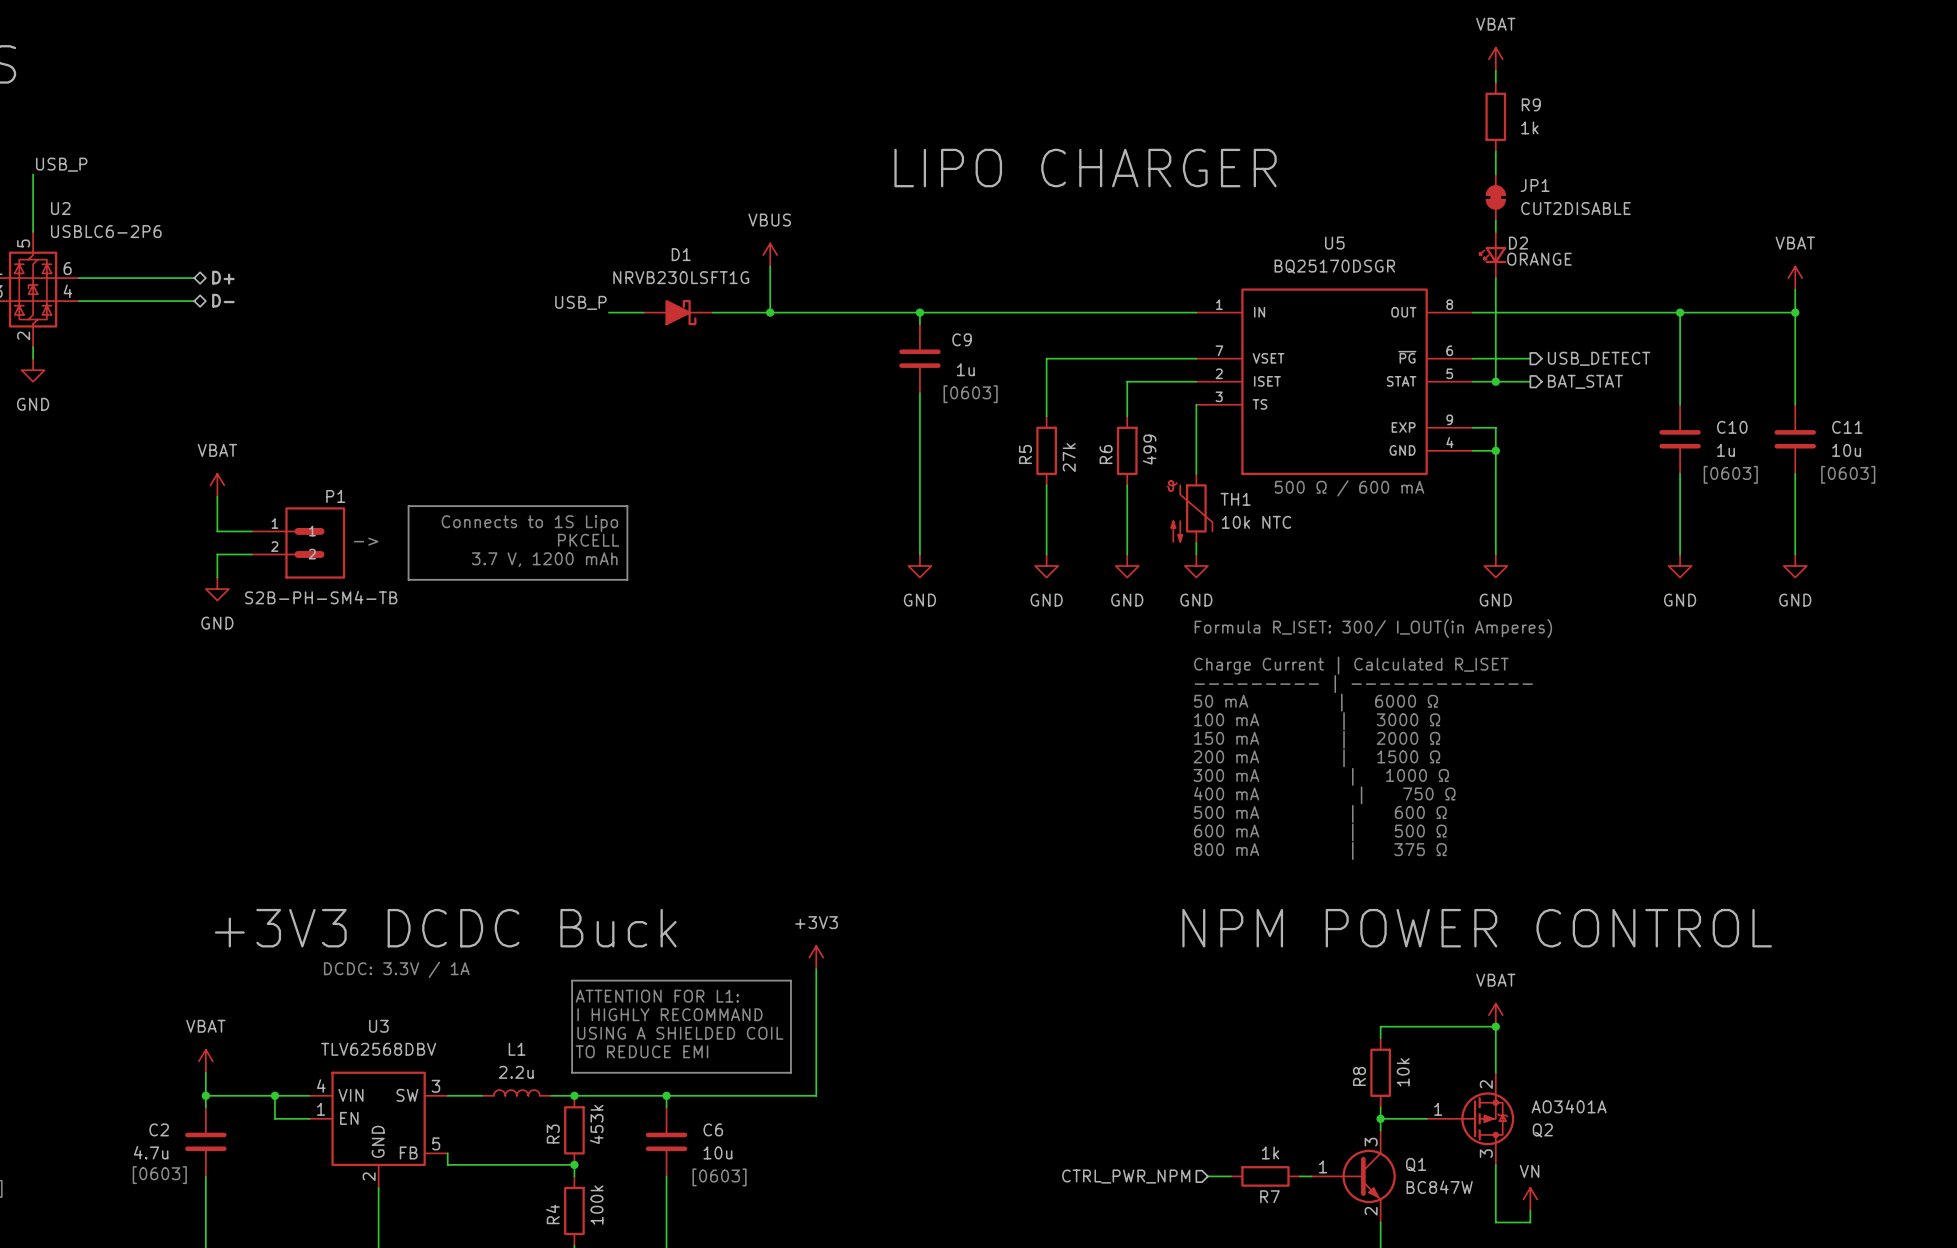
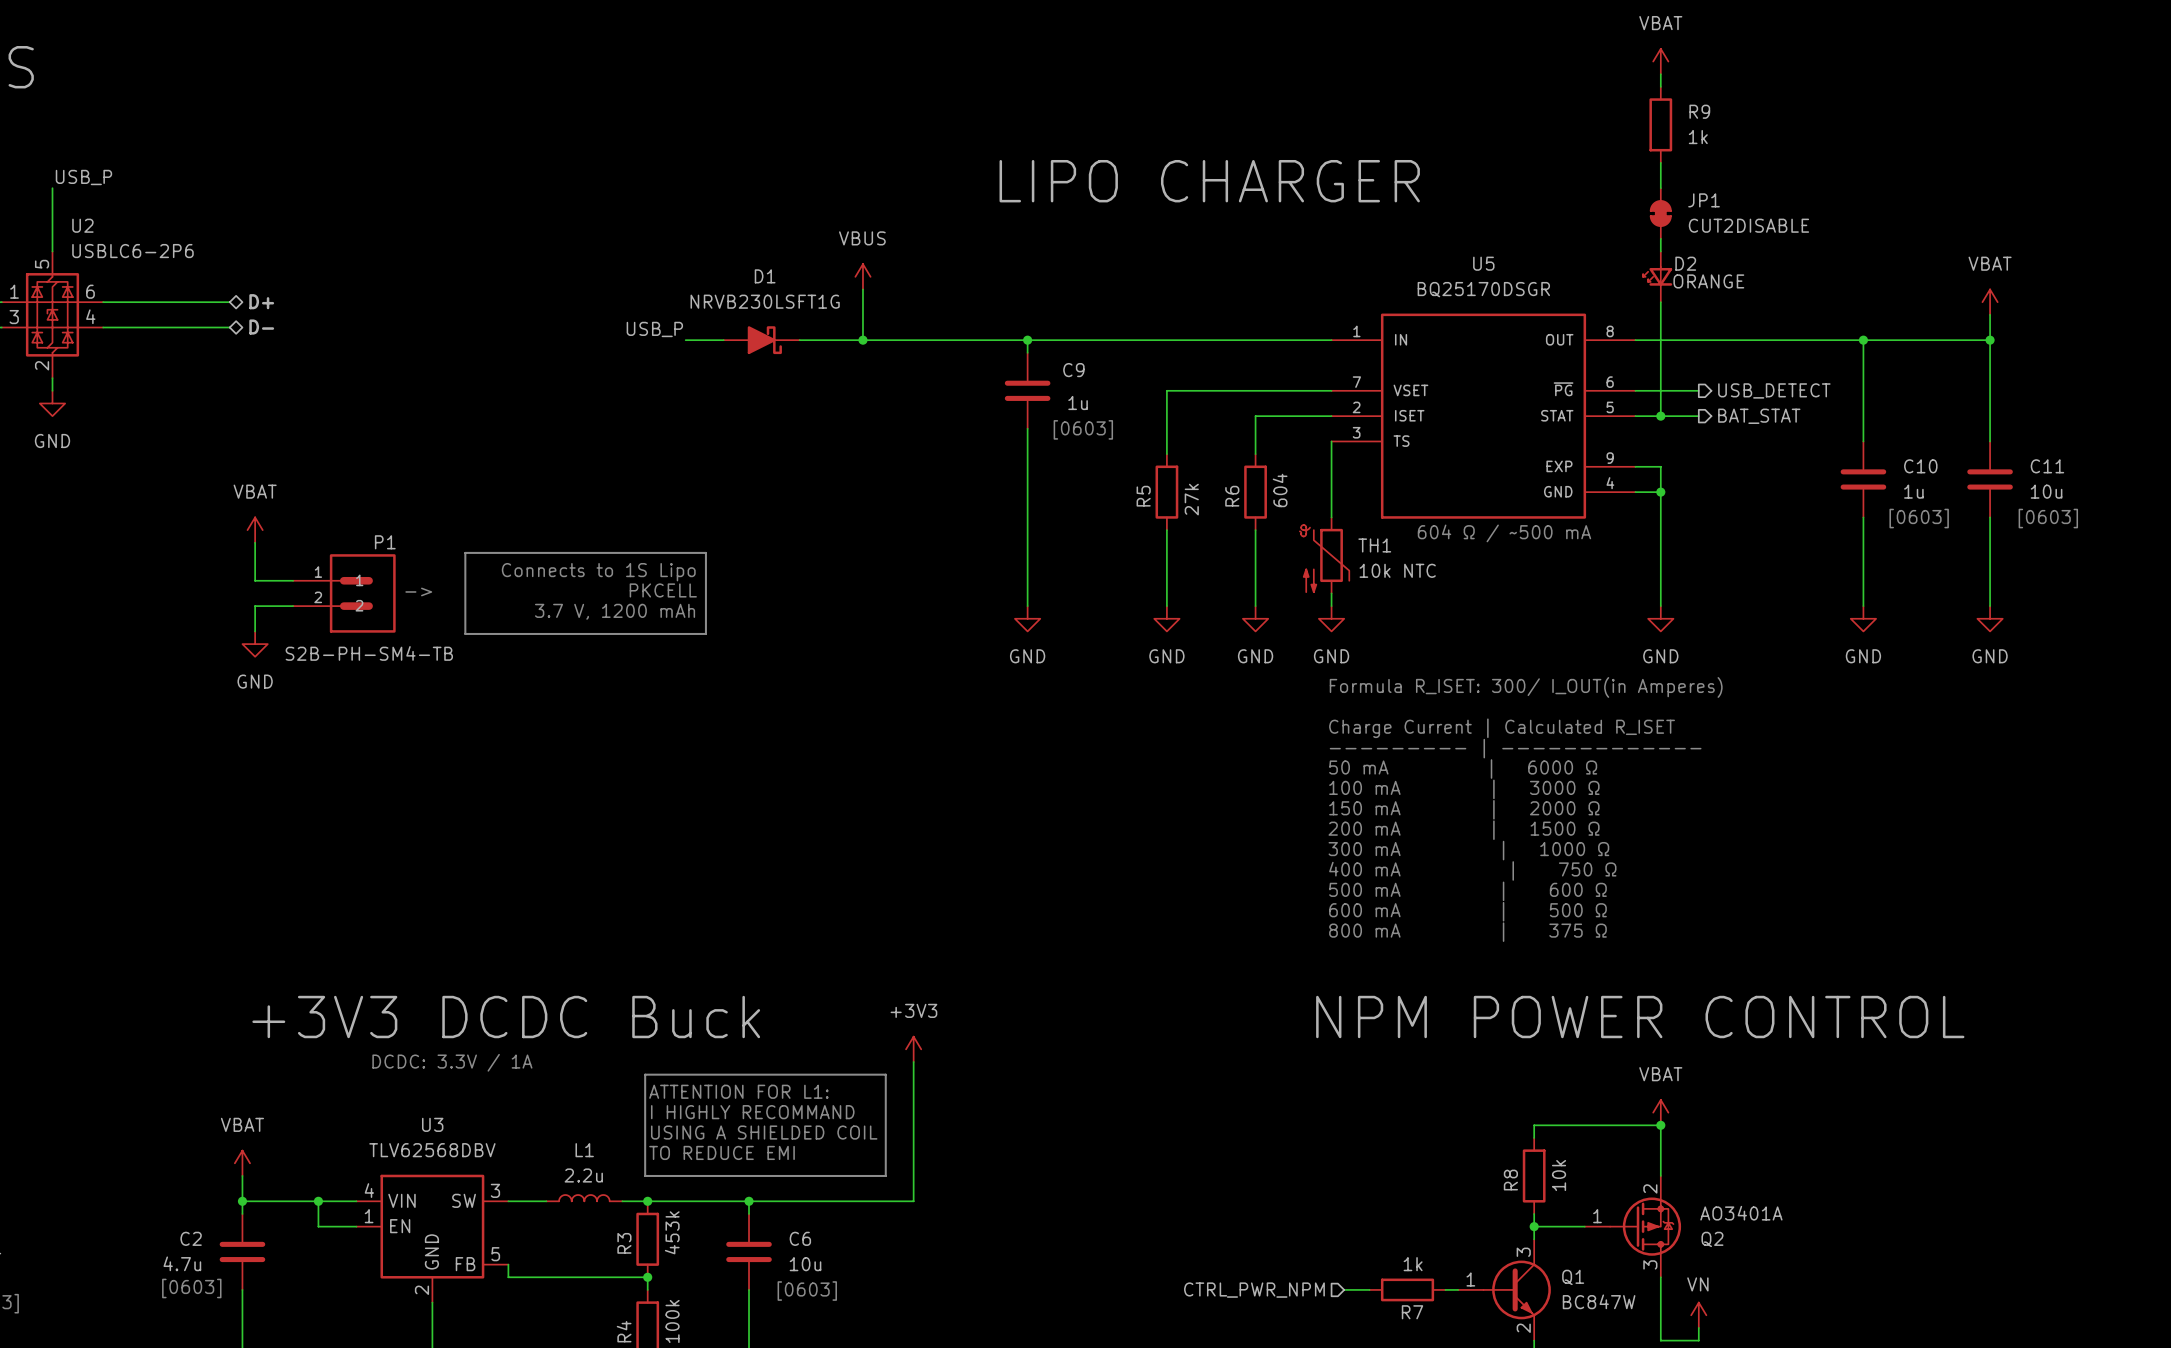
R6 value: 499 (1149, 449) -> 604 (1280, 490)
text: 500 Ω / 600 mA (1349, 488) -> 604 Ω / ~500 mA (1504, 533)

